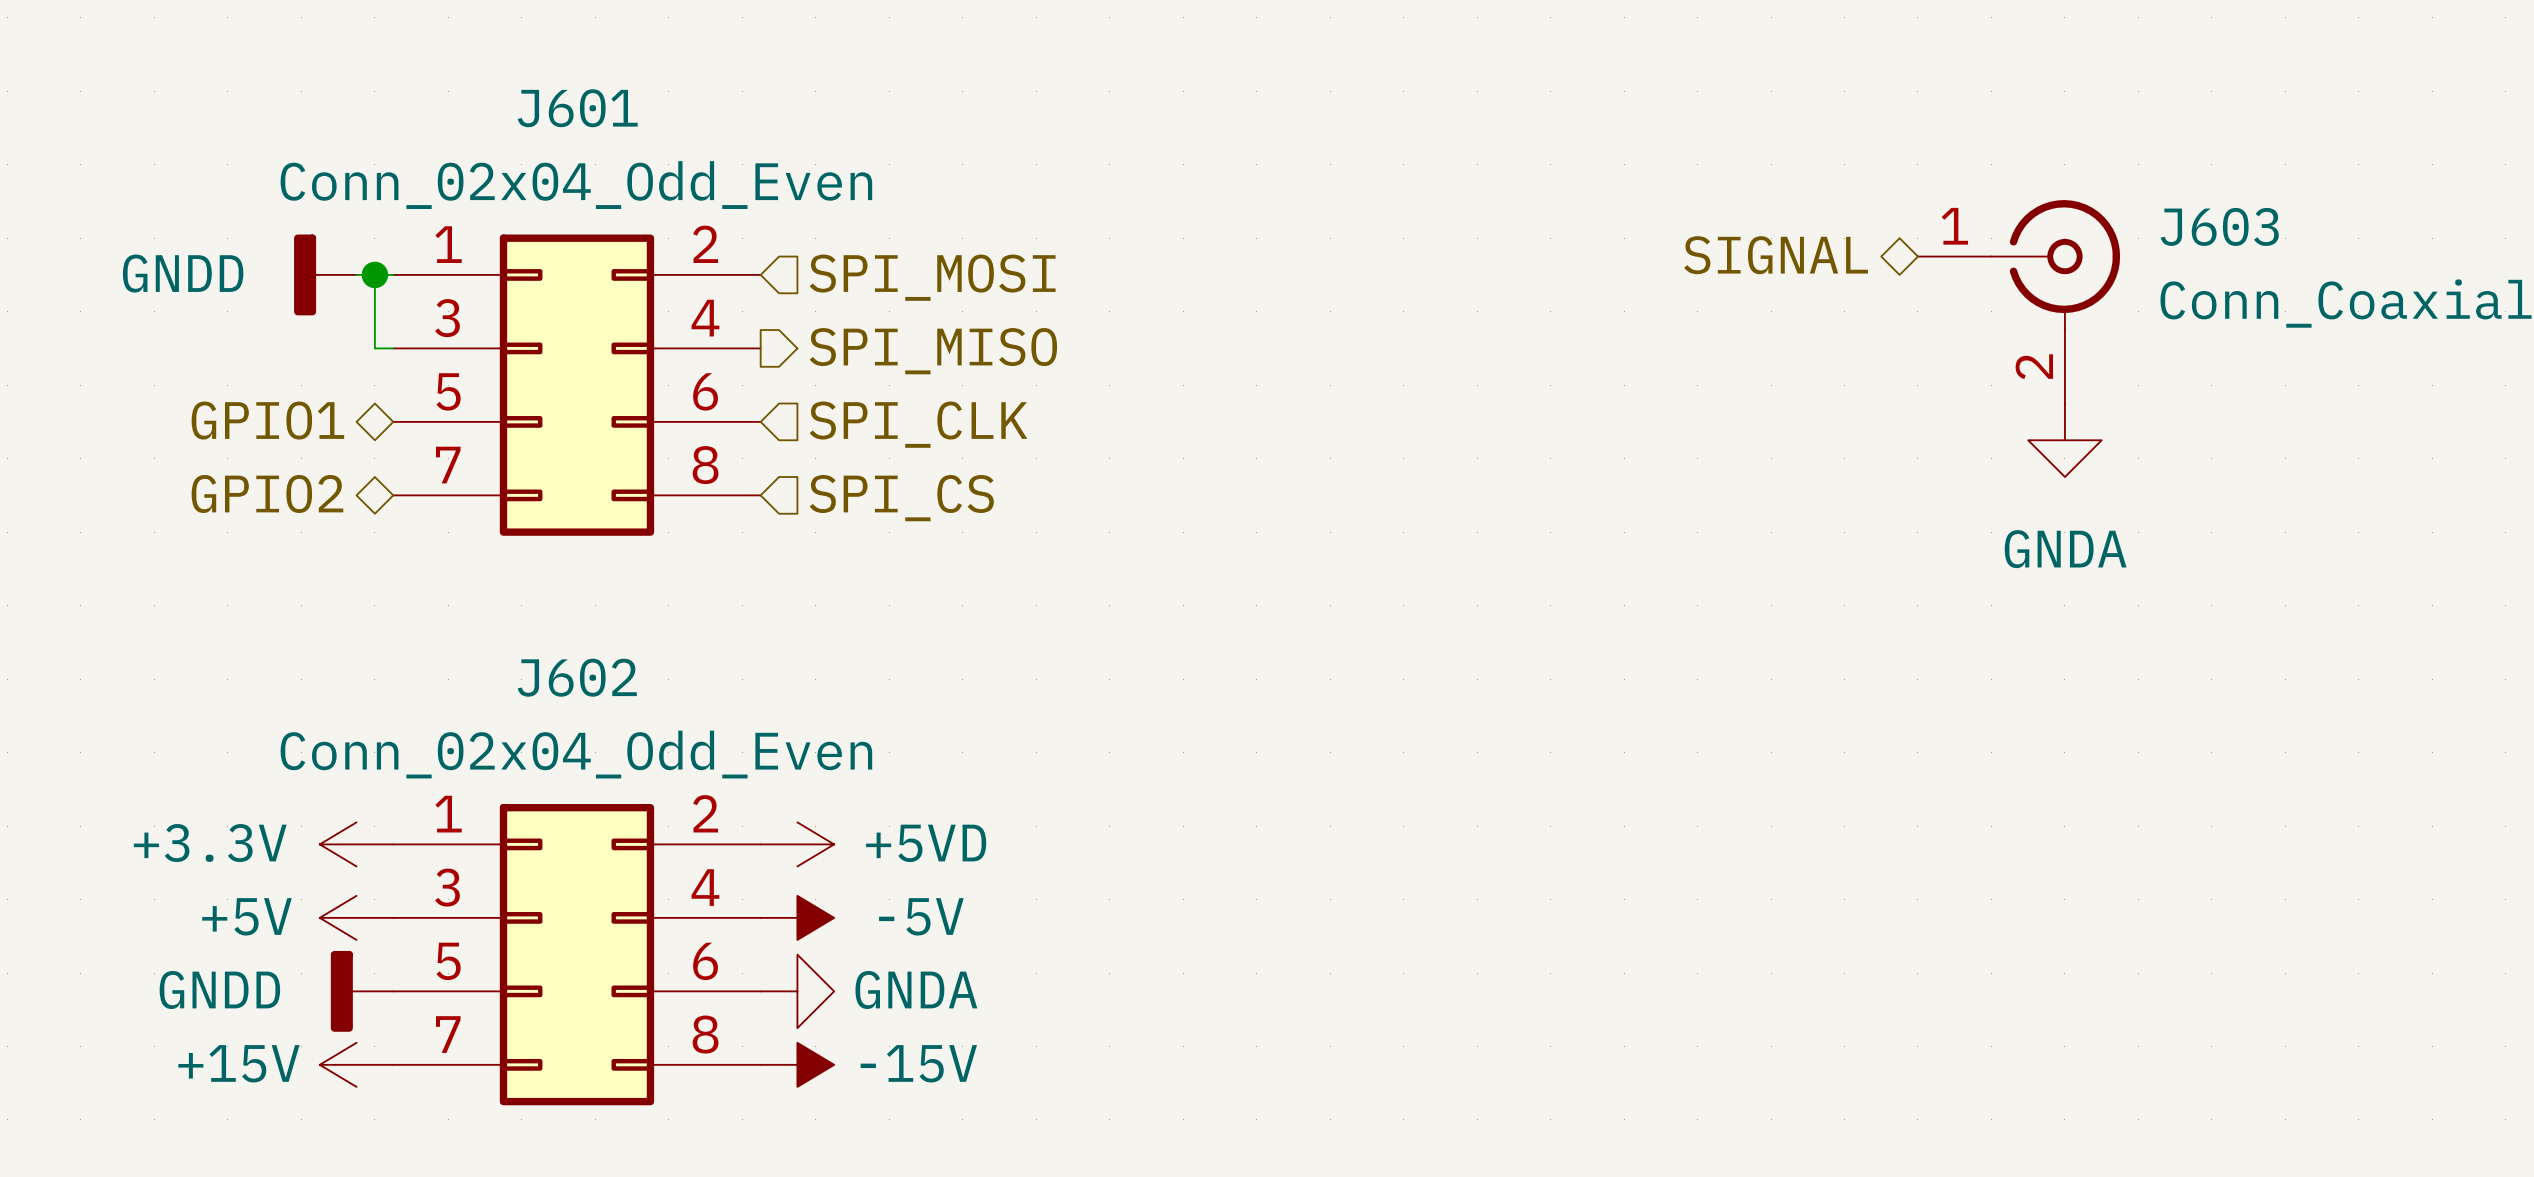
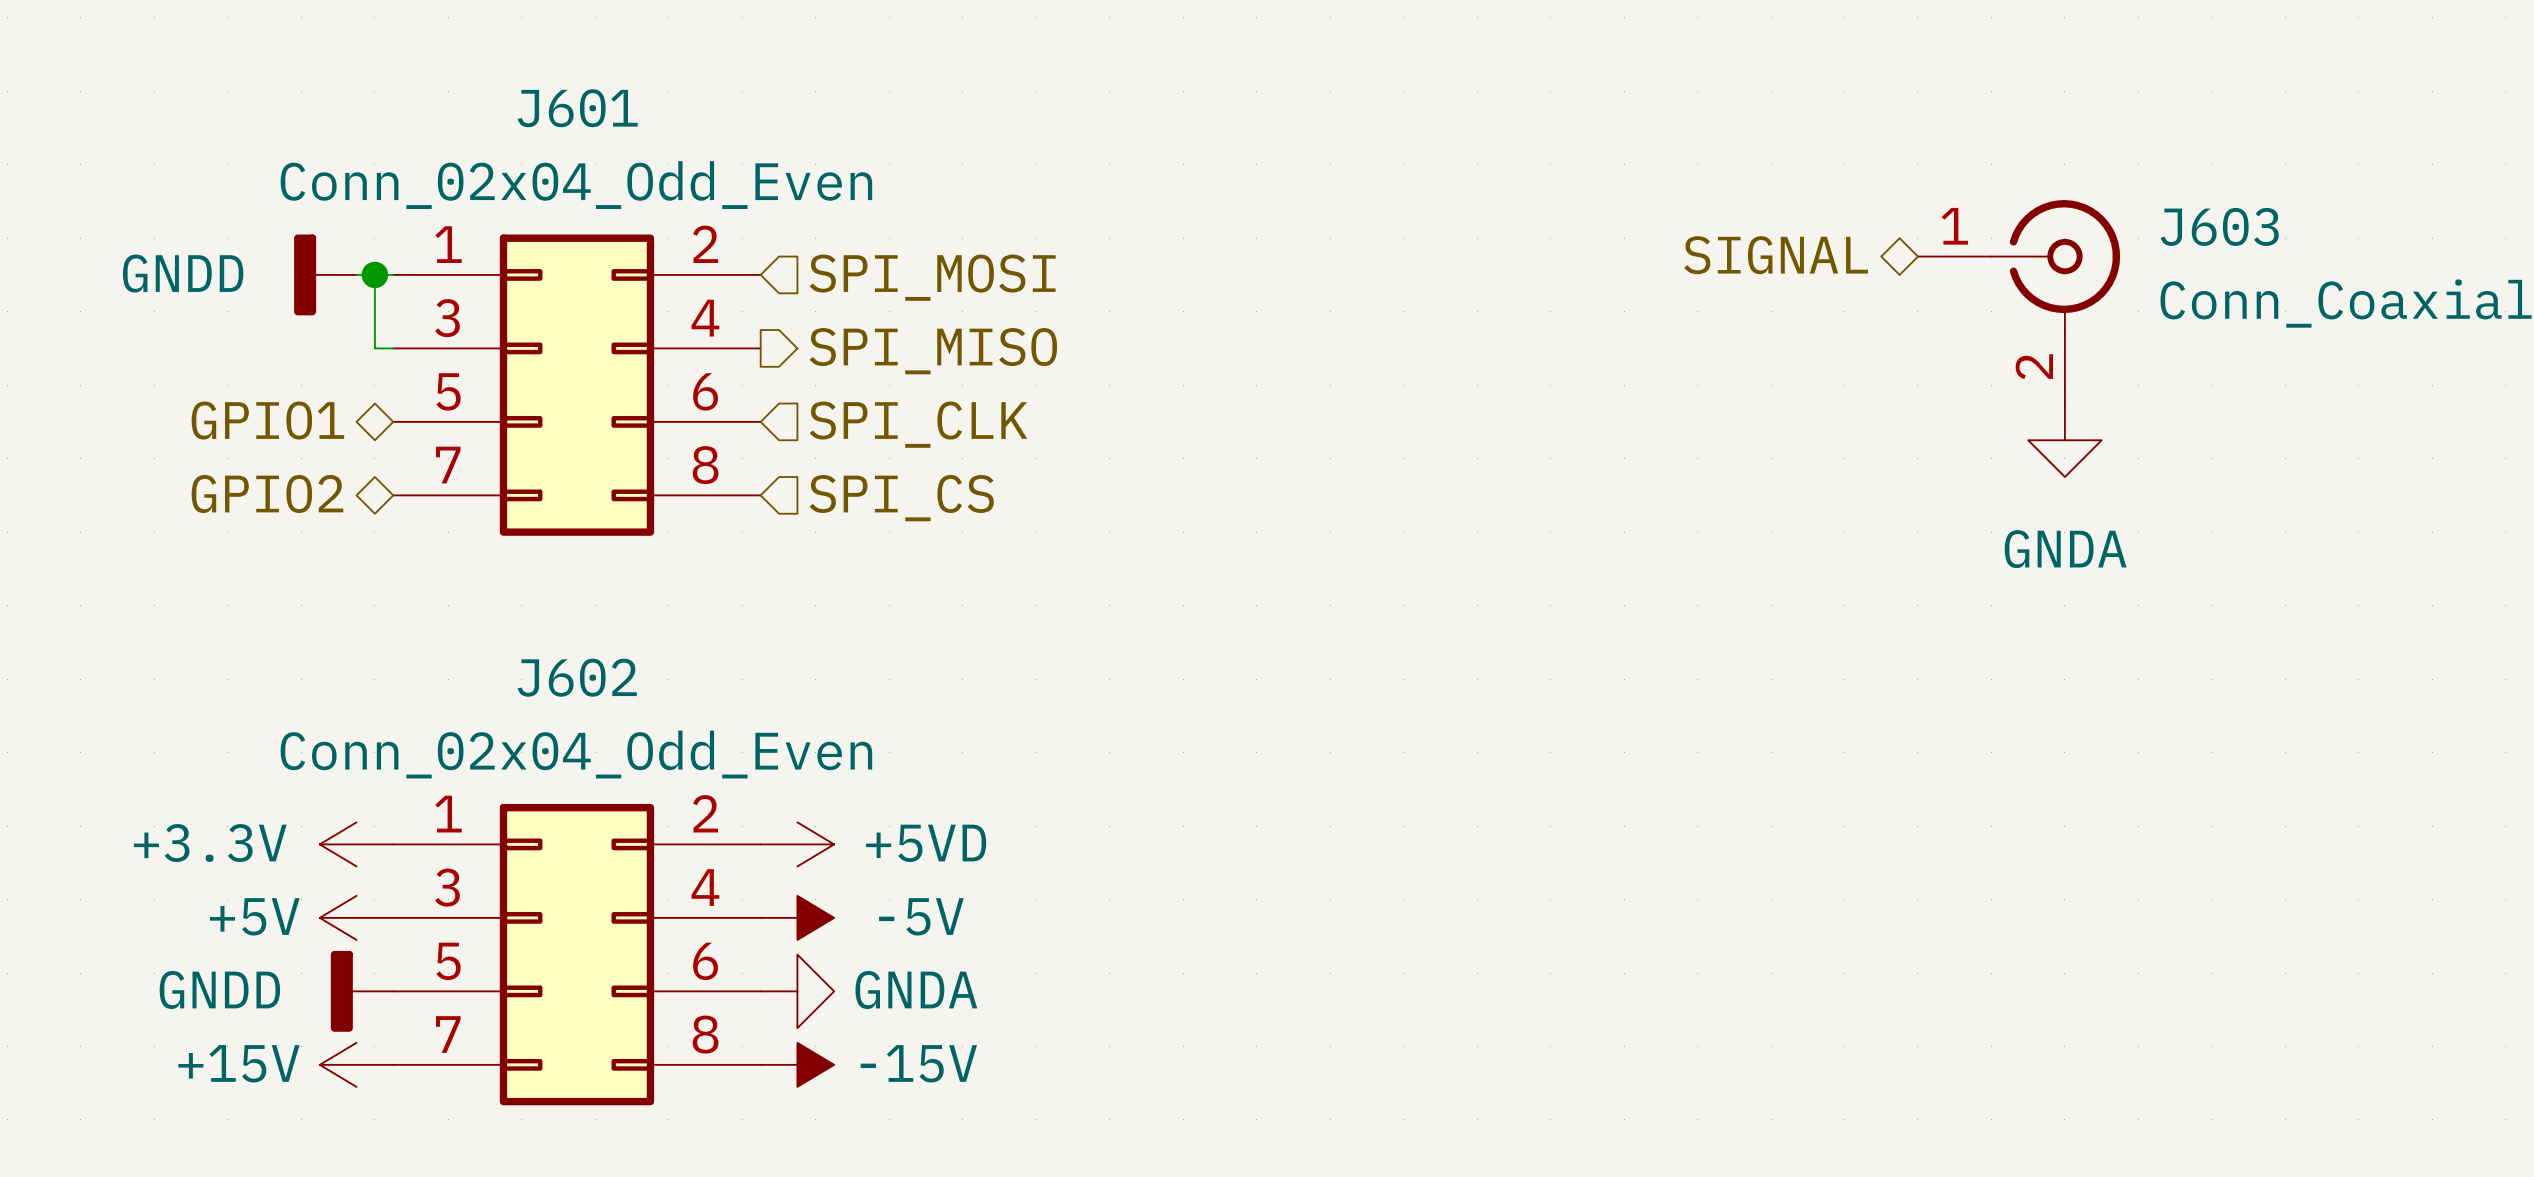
power symbol text position: +5V (247, 916) -> +5V (254, 916)

